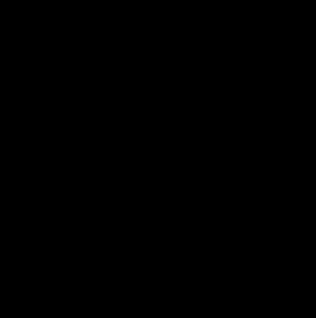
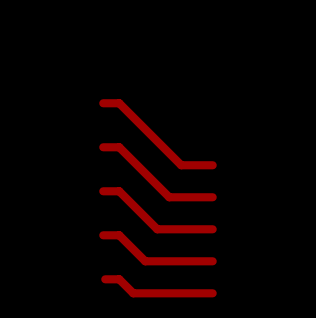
top track: none -> (103, 103) (119, 103) (181, 165) (212, 165)
top track: none -> (103, 147) (119, 147) (169, 197) (212, 197)
top track: none -> (103, 191) (119, 191) (157, 229) (212, 229)
top track: none -> (103, 235) (119, 235) (145, 261) (212, 261)
top track: none -> (105, 279) (119, 279) (133, 293) (212, 293)

